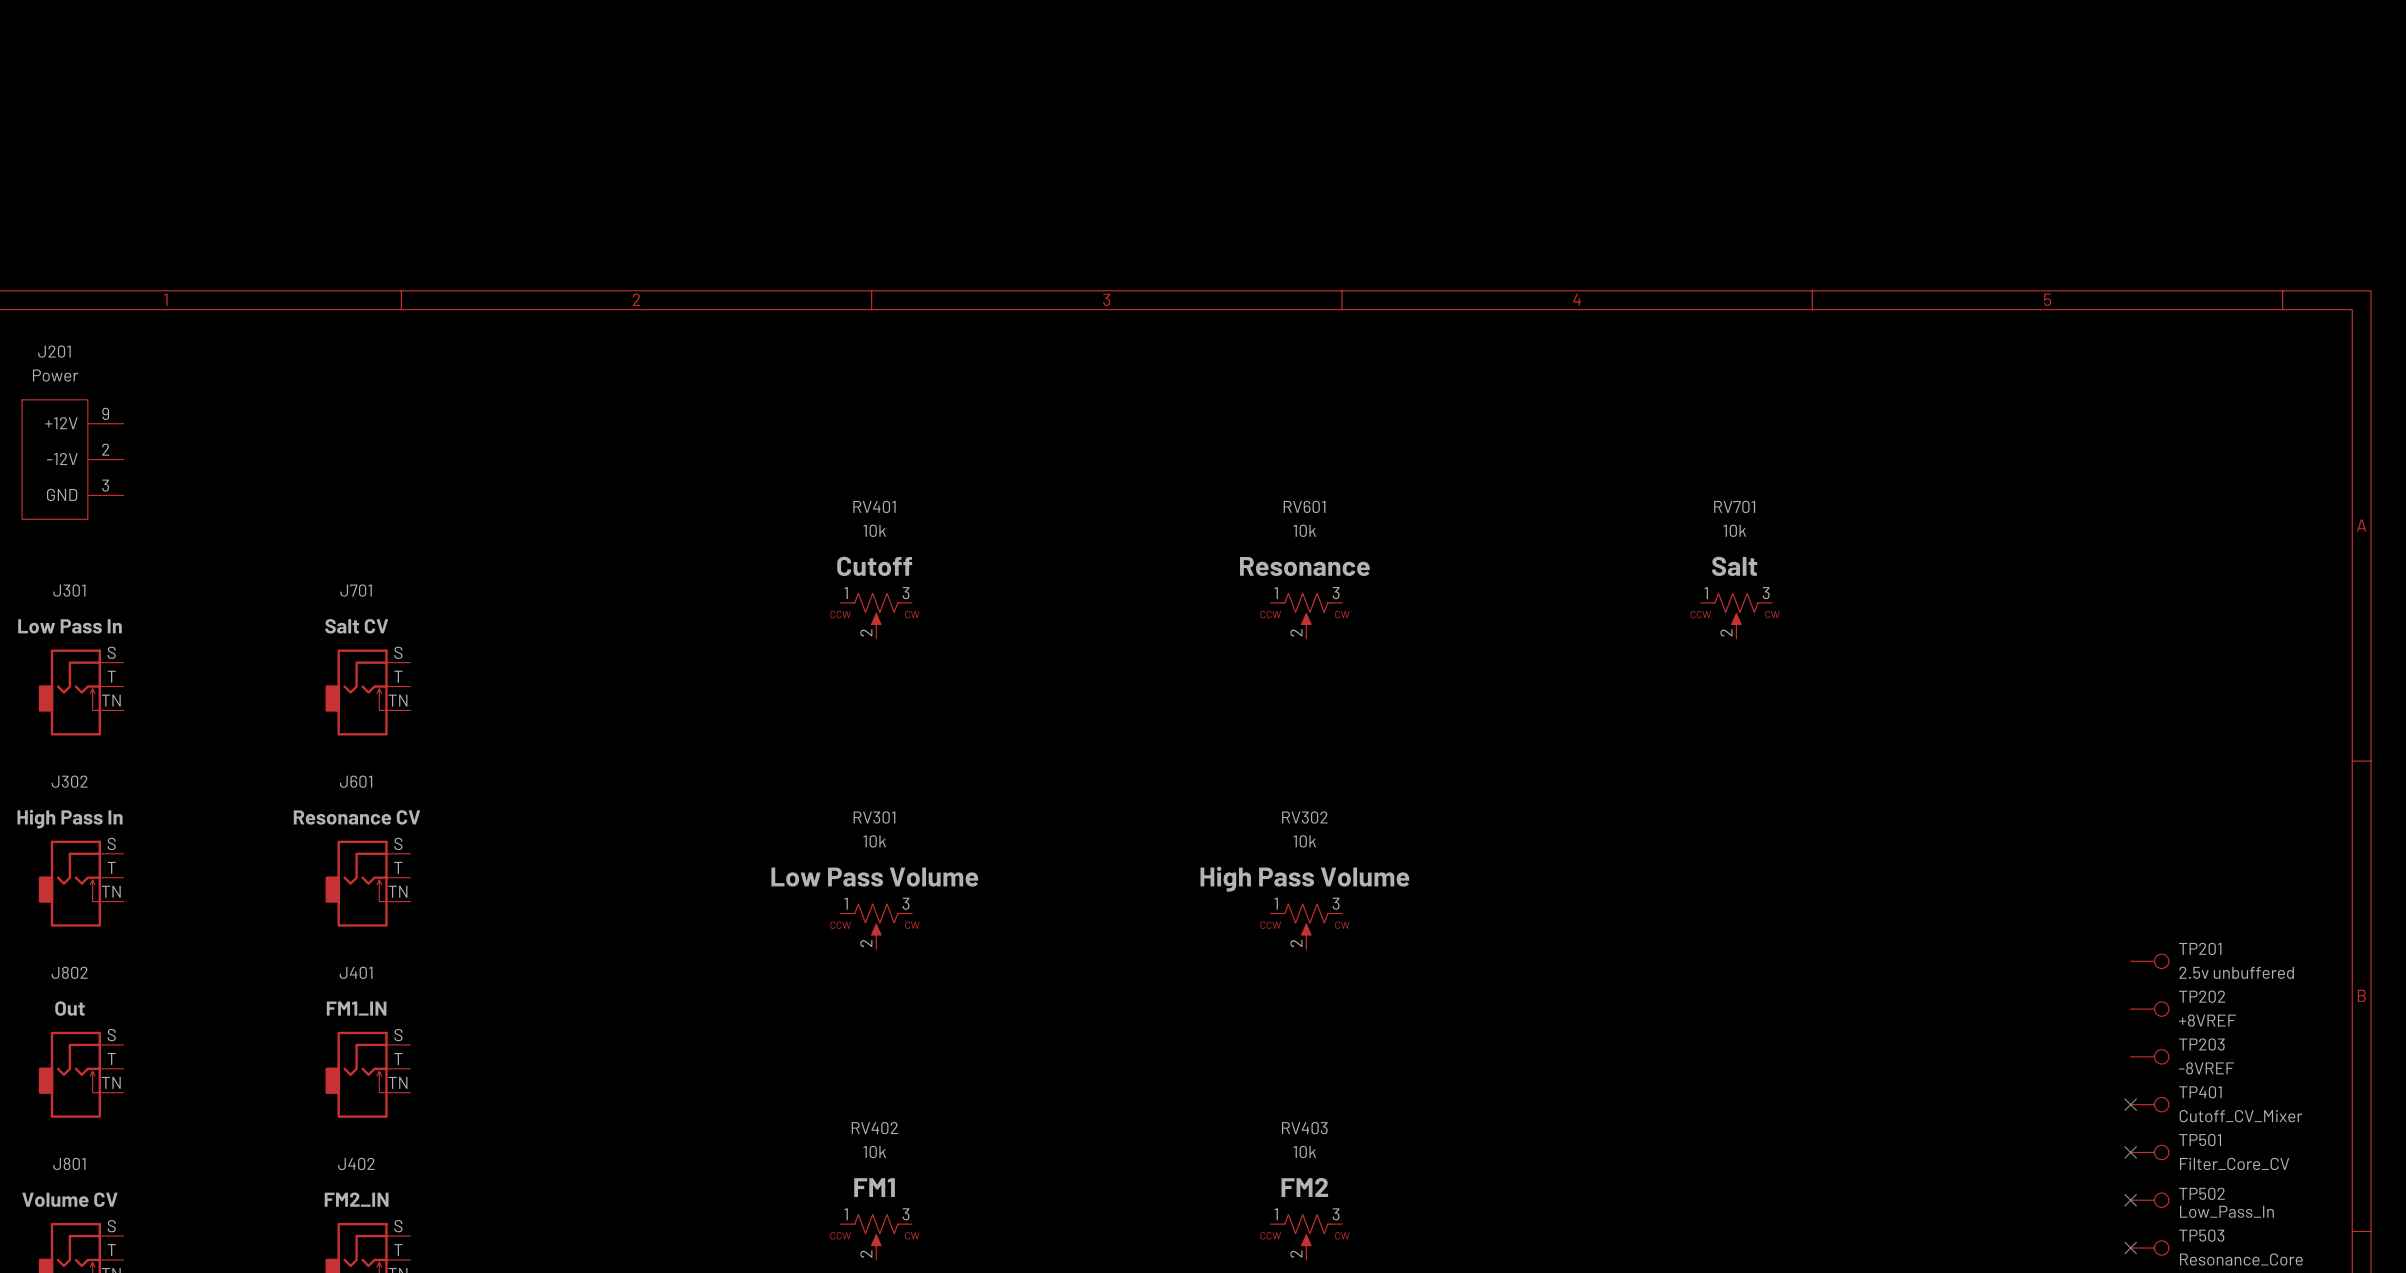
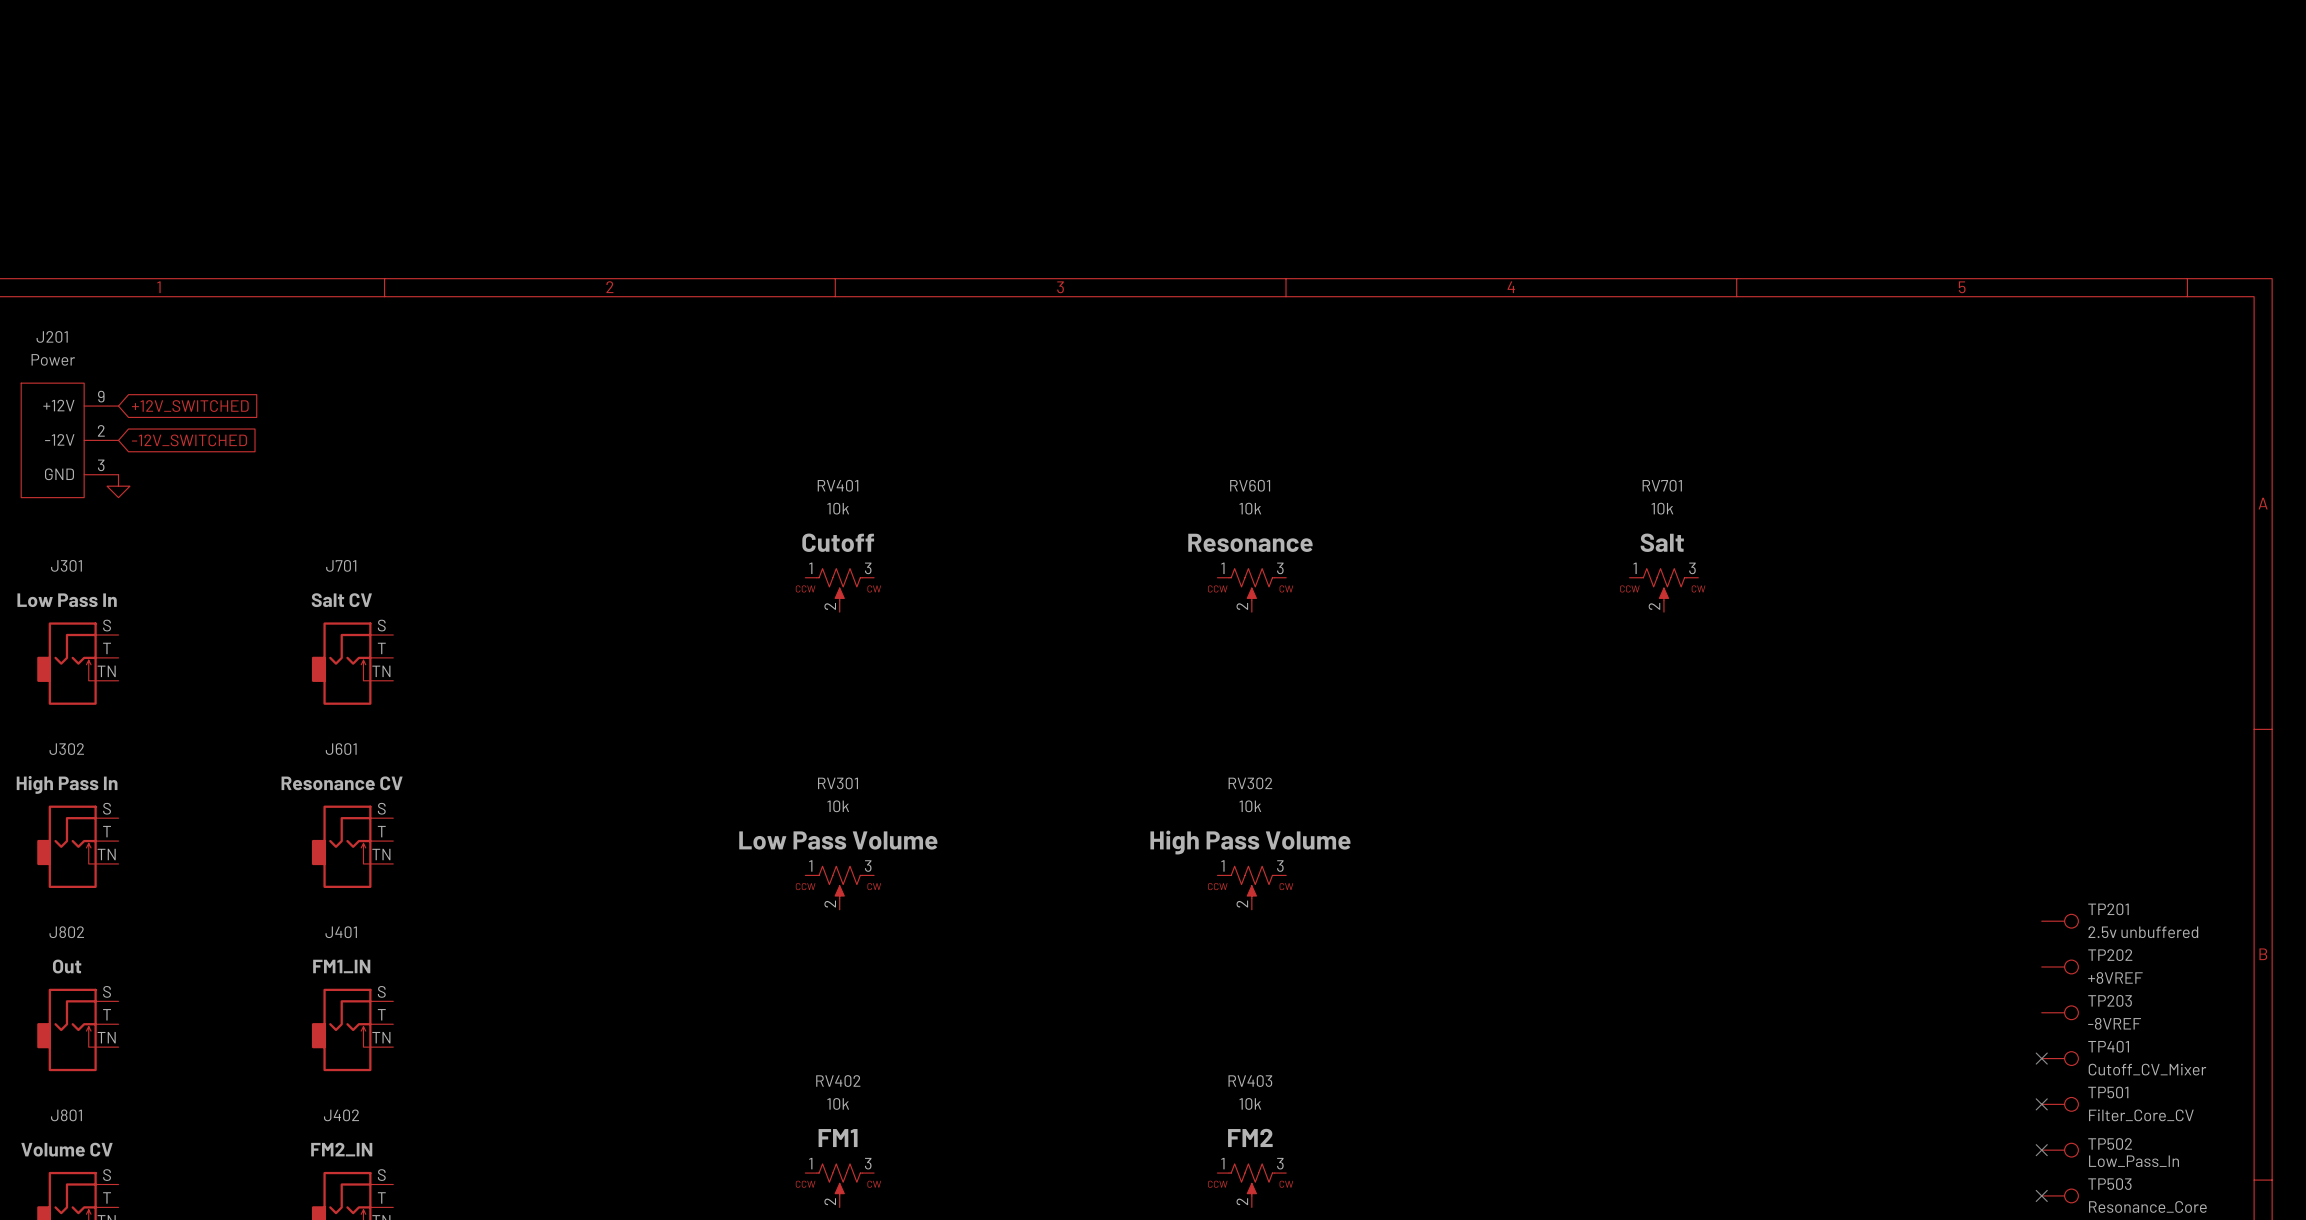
global label: none -> +12V_SWITCHED (190, 406)
global label: none -> -12V_SWITCHED (189, 440)
power symbol: none -> (118, 486)

